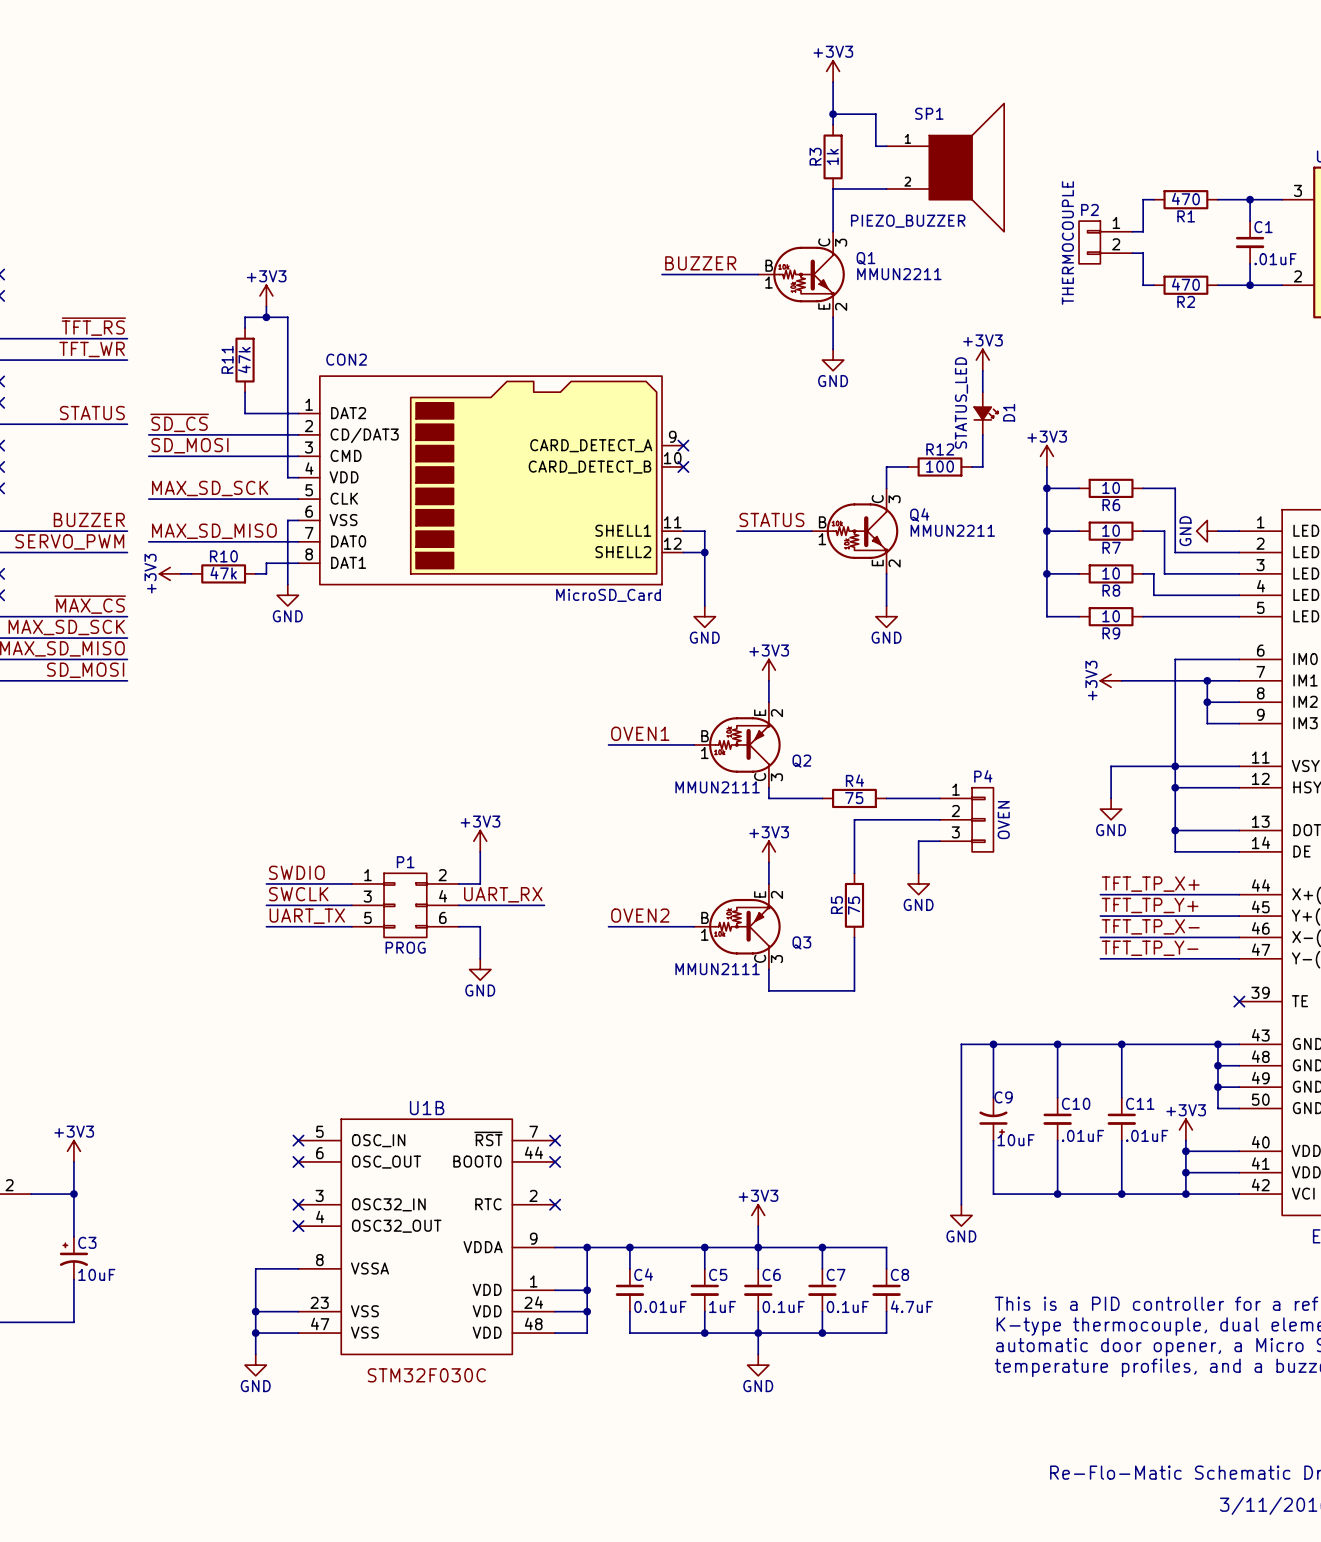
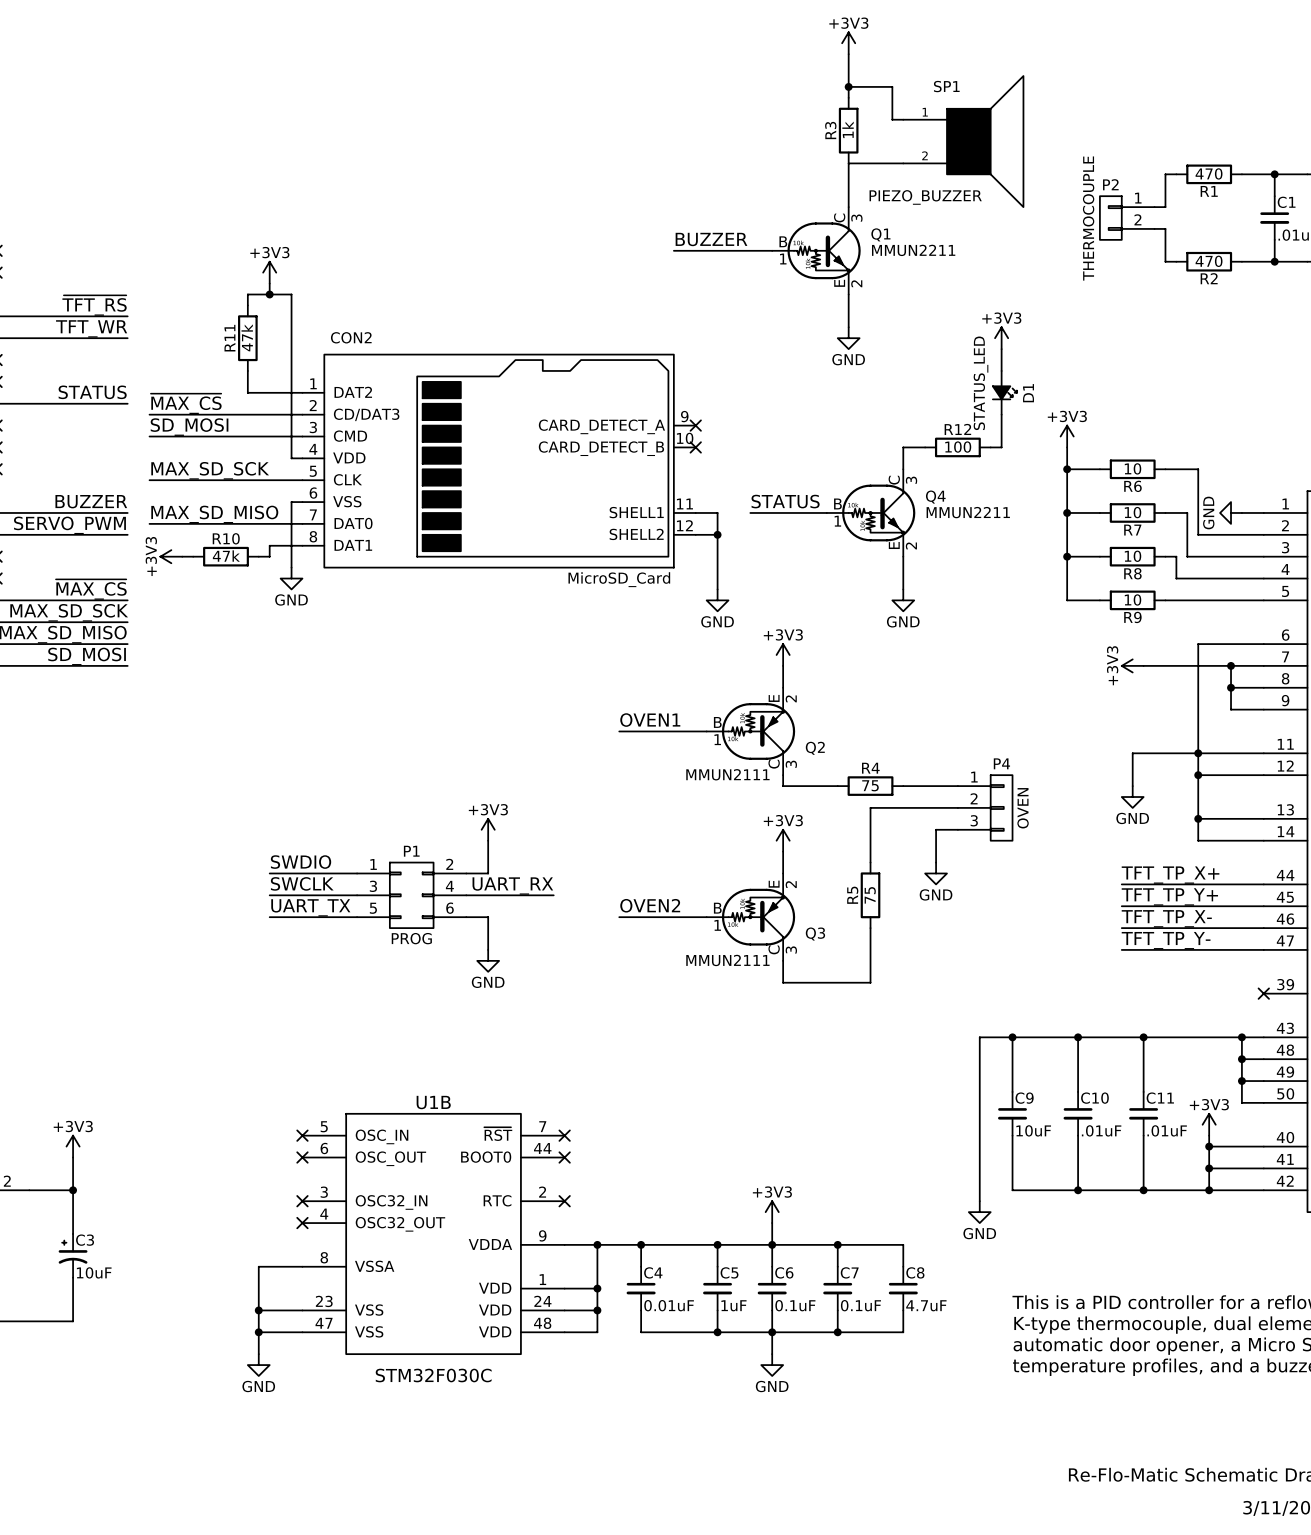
label: ~{SD_CS} (179, 422) -> ~{MAX_CS} (186, 403)
C9 symbol: [979, 1097, 1008, 1141] -> [998, 1091, 1028, 1136]

